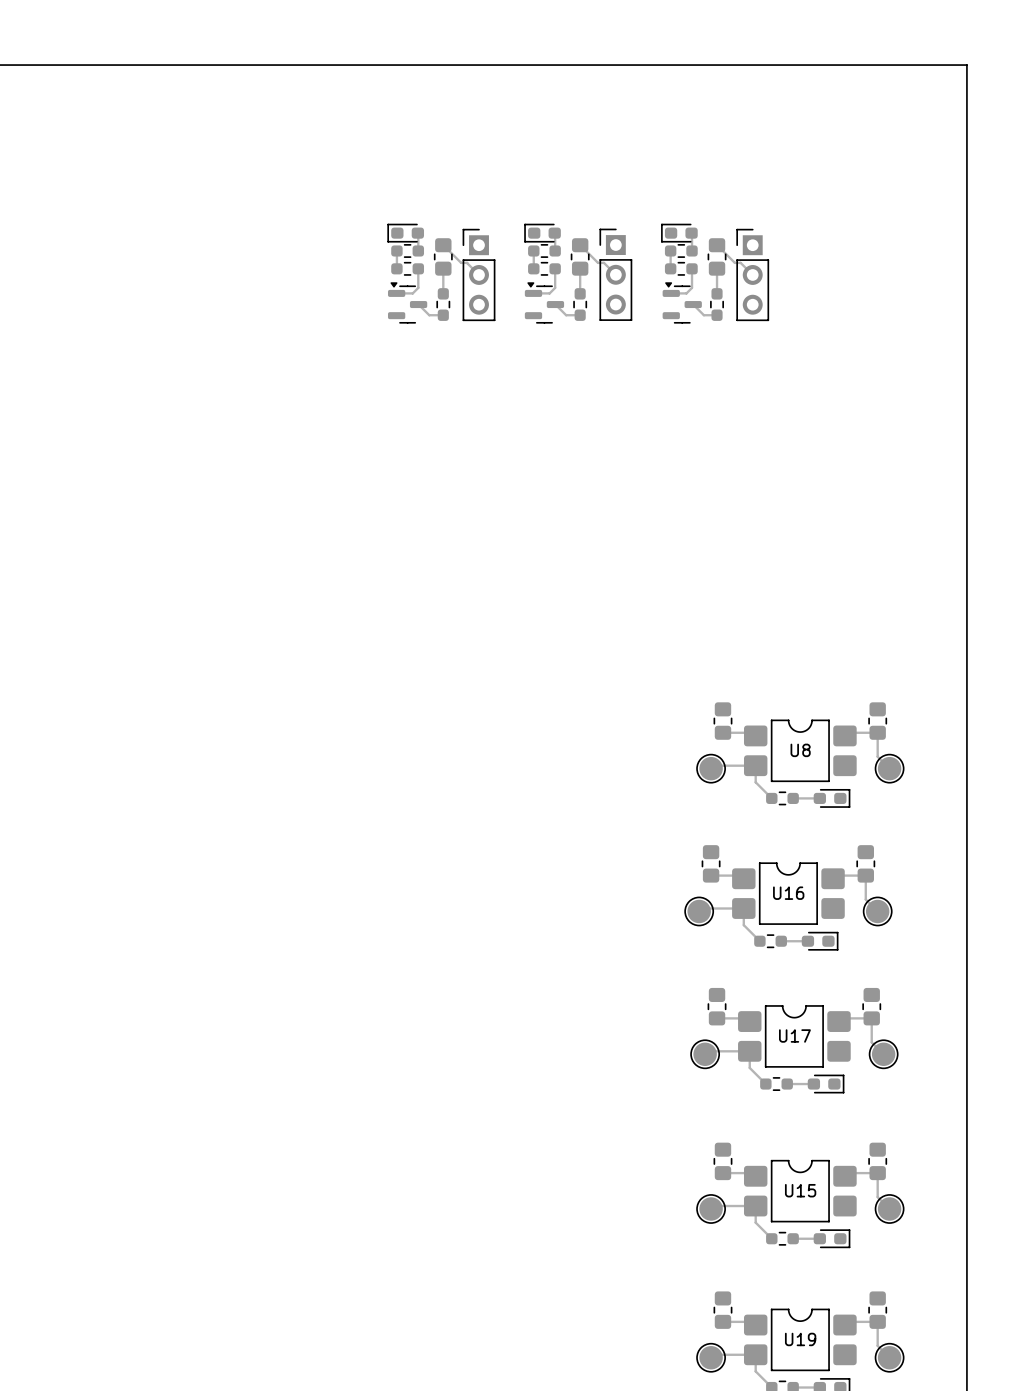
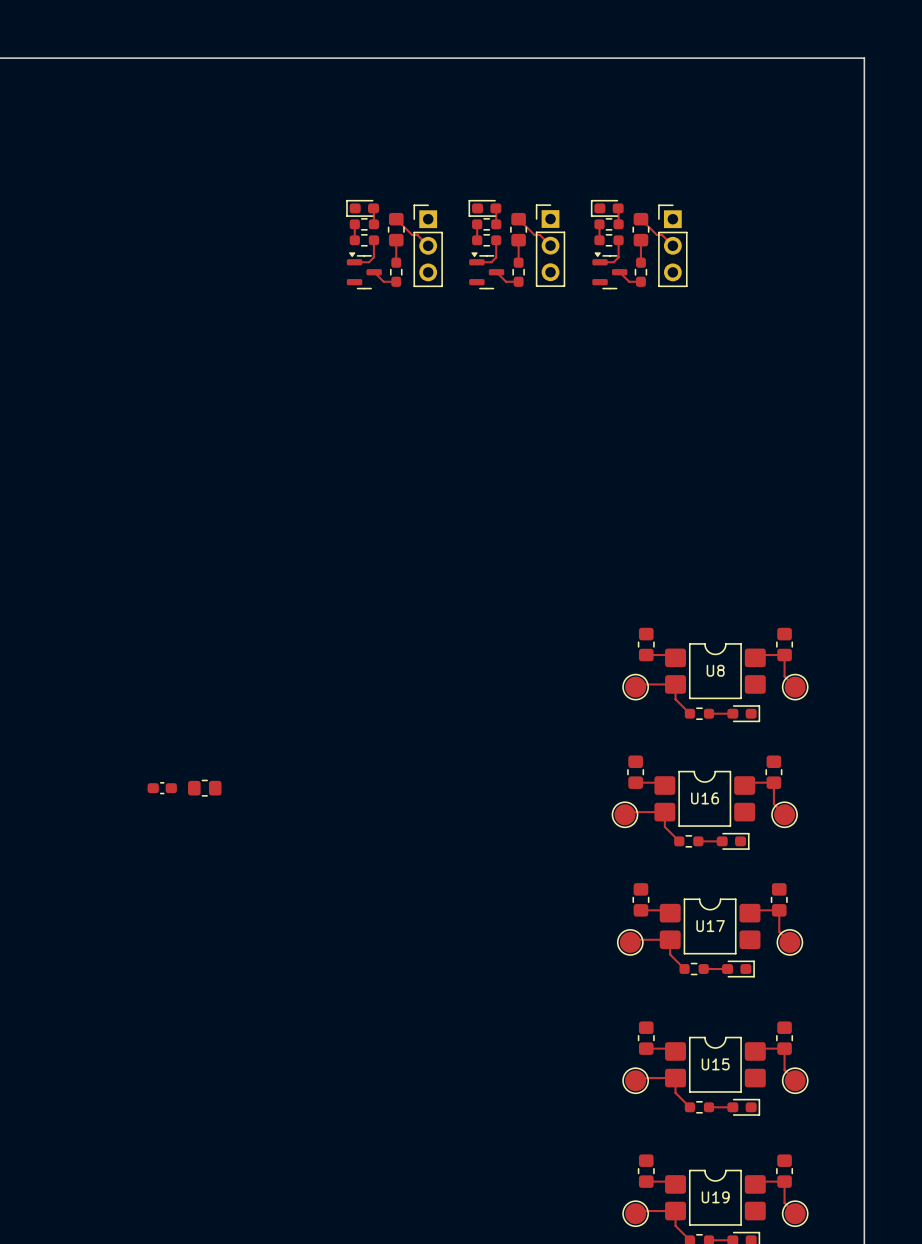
part: none -> (162, 788)
part: none -> (204, 788)

